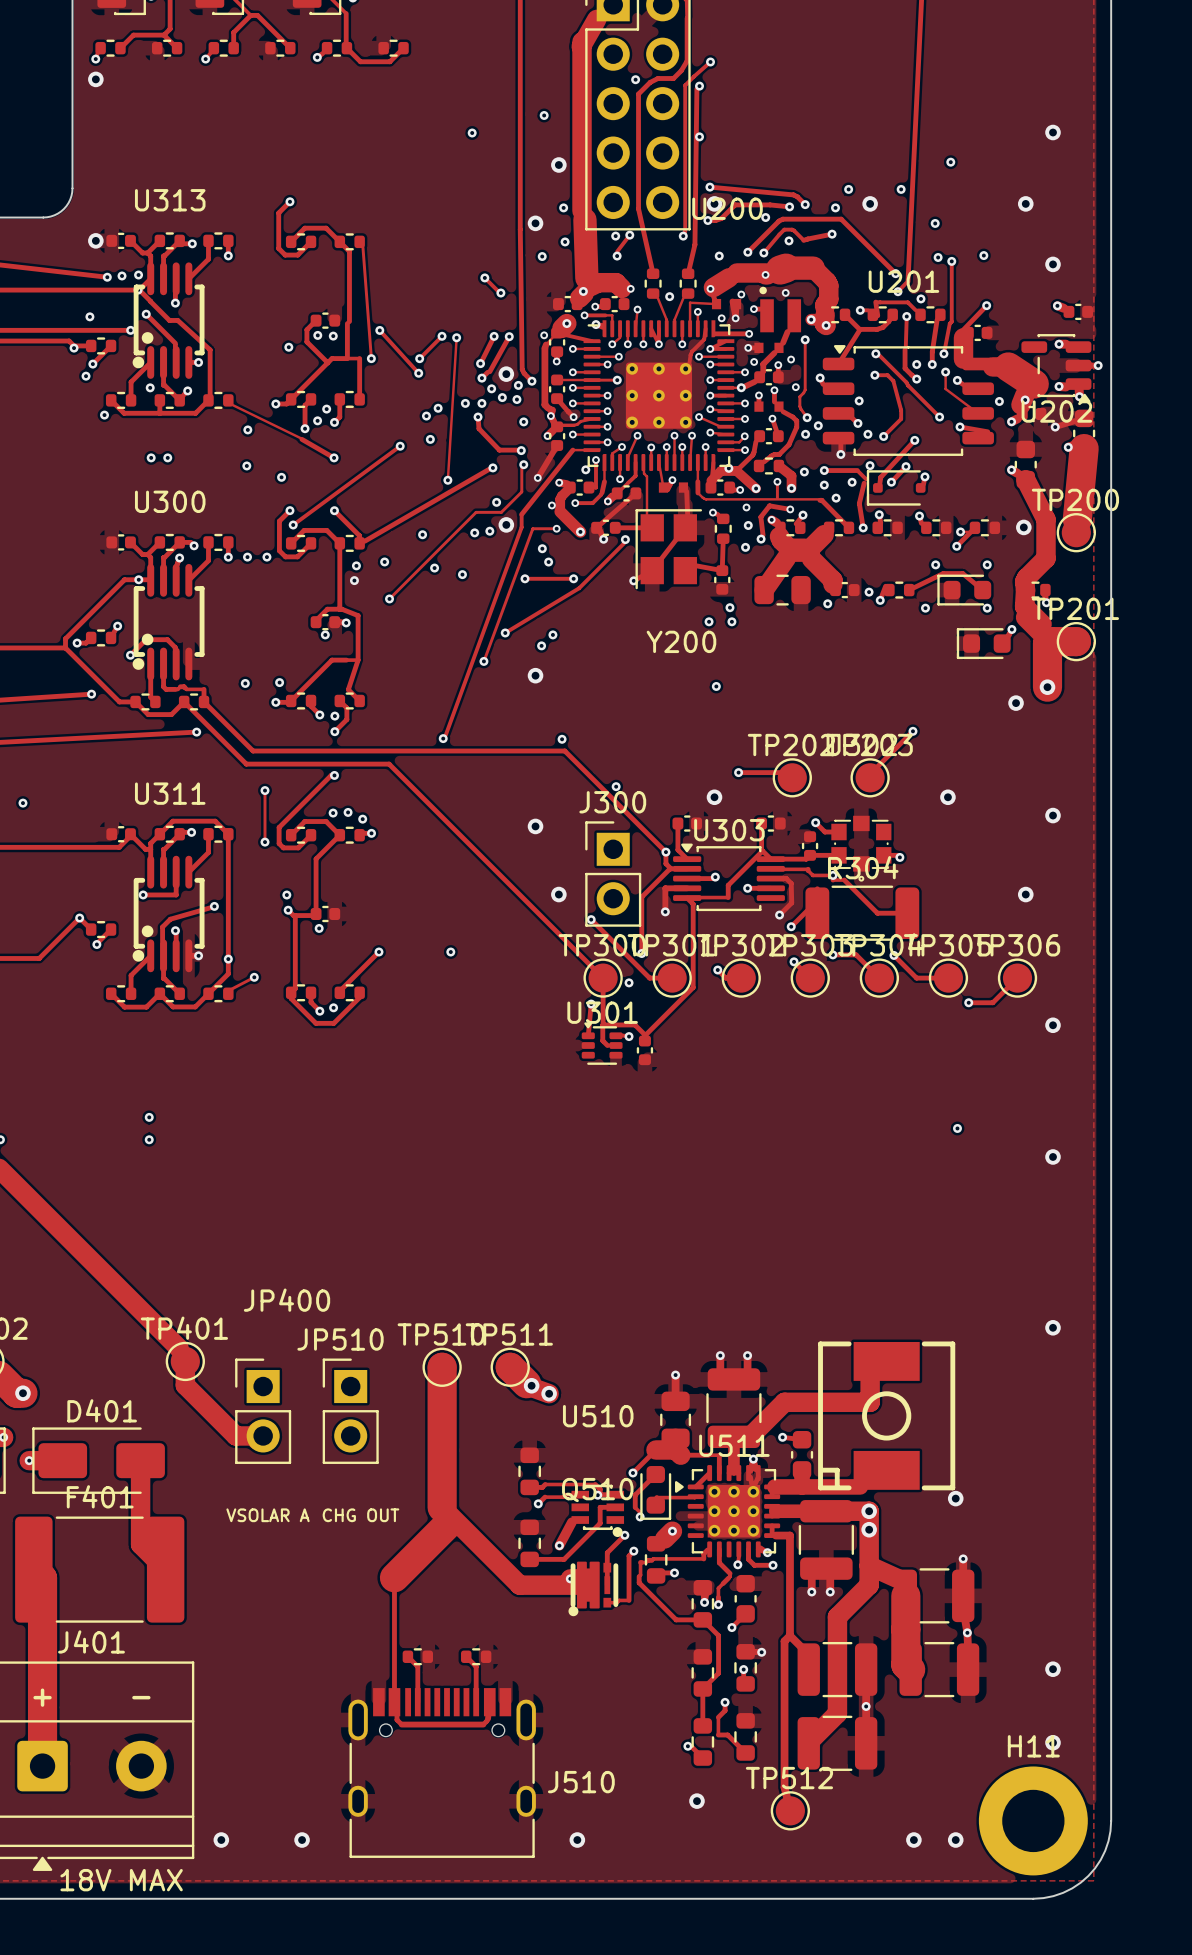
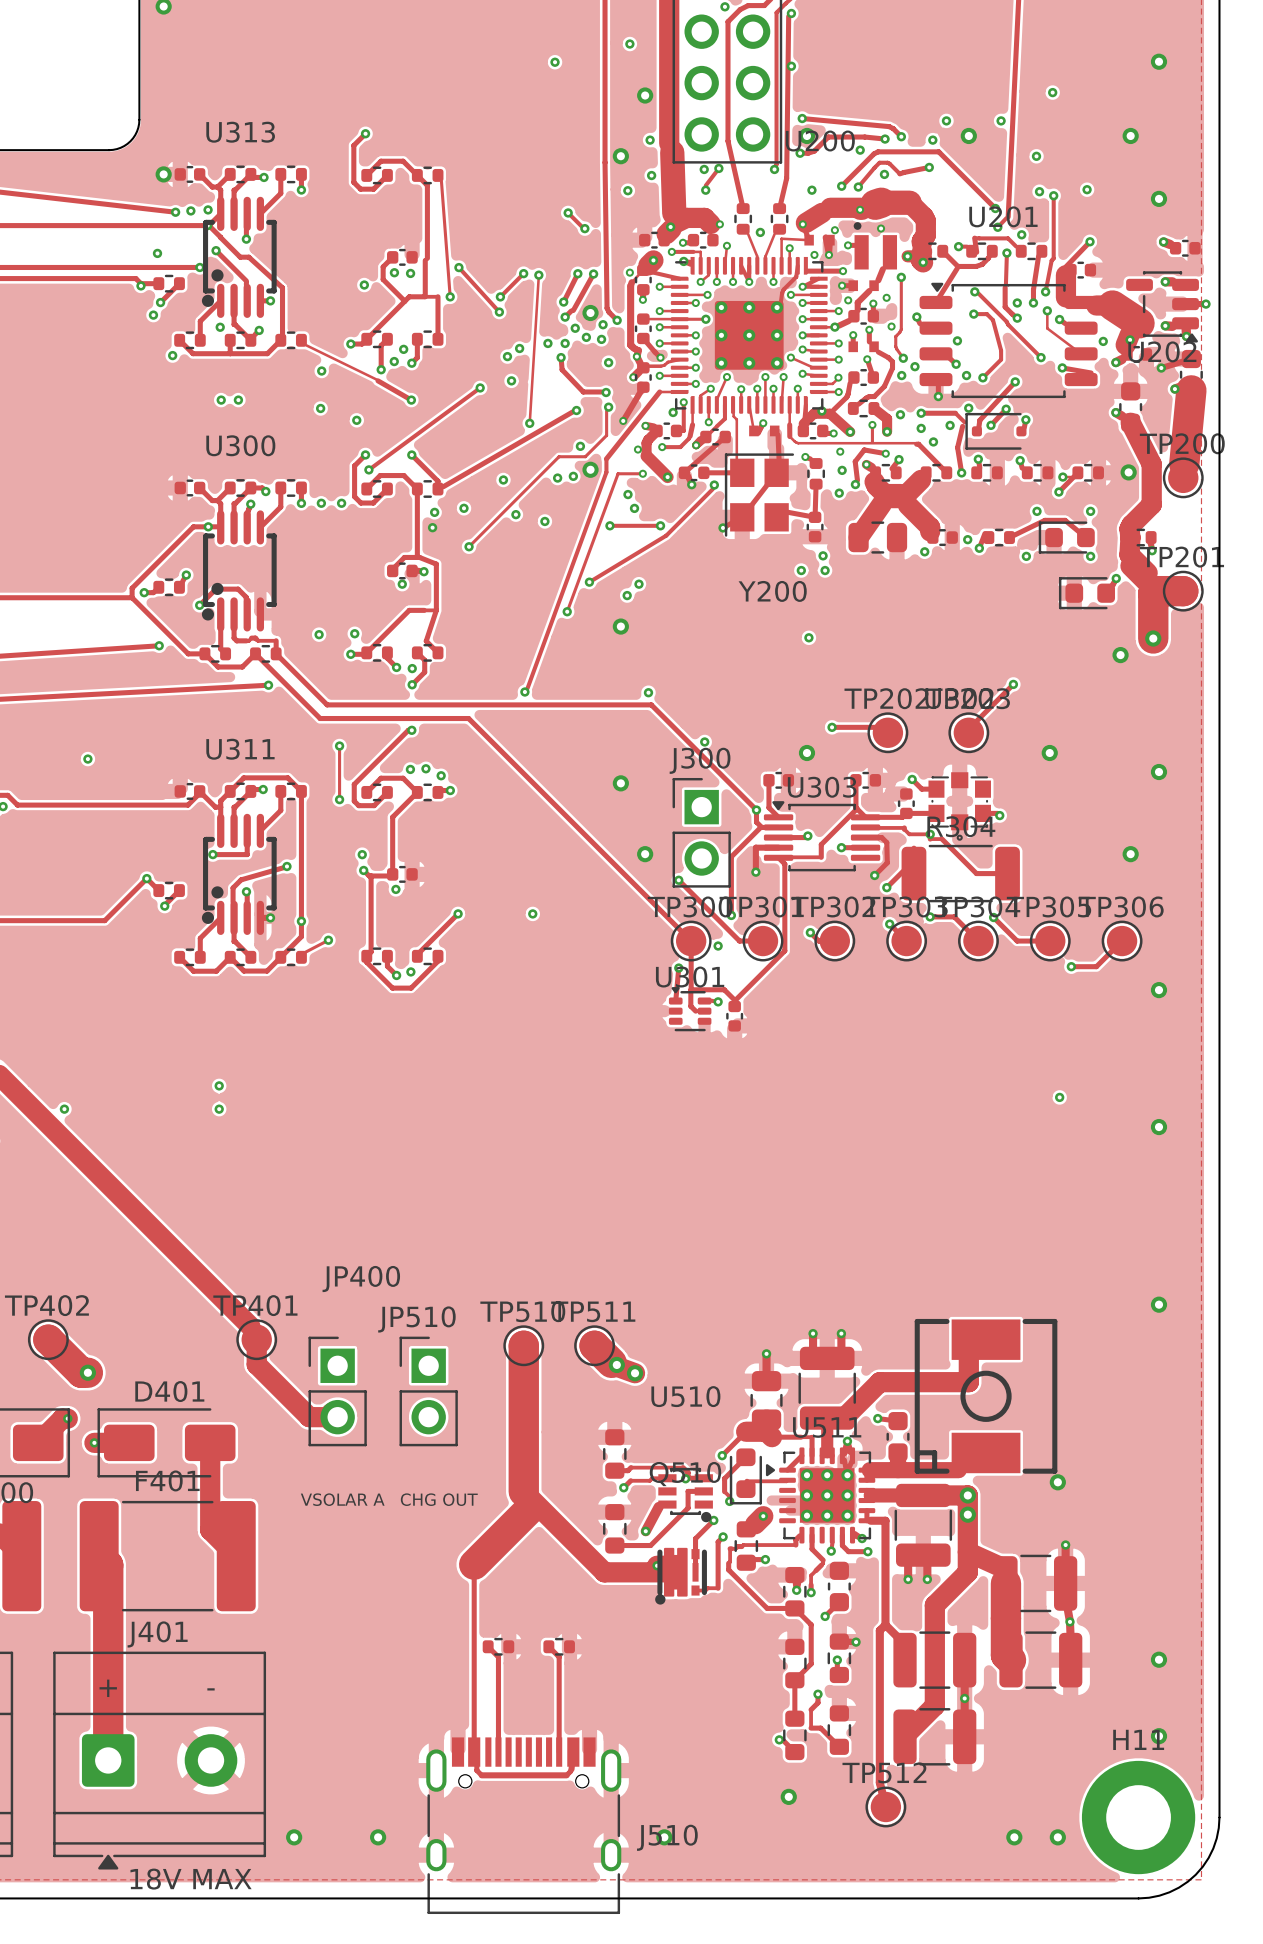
track: none -> (474, 1679) (474, 1738)
track: none -> (498, 1694) (498, 1752)
track: none -> (559, 1694) (559, 1752)
track: (489, 1702) (488, 1718) (483, 1724) (401, 1724) (397, 1719) (397, 1715) -> (573, 1752) (571, 1769) (566, 1775) (481, 1775) (476, 1770) (476, 1765)
J510 position: (442, 1773) -> (523, 1825)

